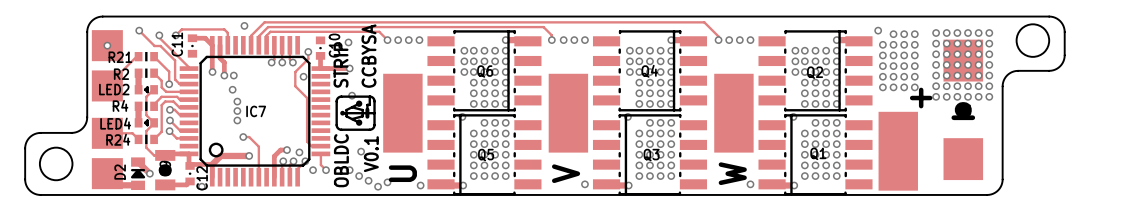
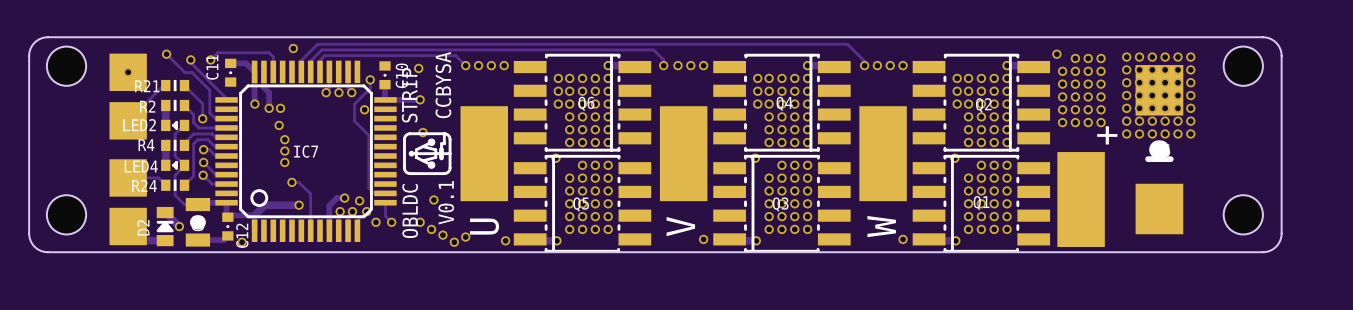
board edge: (102, 16) (93, 19) (87, 30) (87, 117) (85, 125) (81, 129) (73, 132) (34, 134) (28, 138) (25, 148) -> (122, 37) (45, 37) (36, 41) (31, 46) (29, 55) (29, 196)
hole: none -> (66, 66)
board edge: (1064, 55) (1061, 64) (1055, 69) (1016, 70) (1008, 74) (1004, 78) (1002, 86) (1002, 181) (996, 191) (987, 194) -> (1281, 83) (1281, 233) (1279, 242) (1274, 248) (1265, 252) (1188, 252)
hole: none -> (1243, 214)

